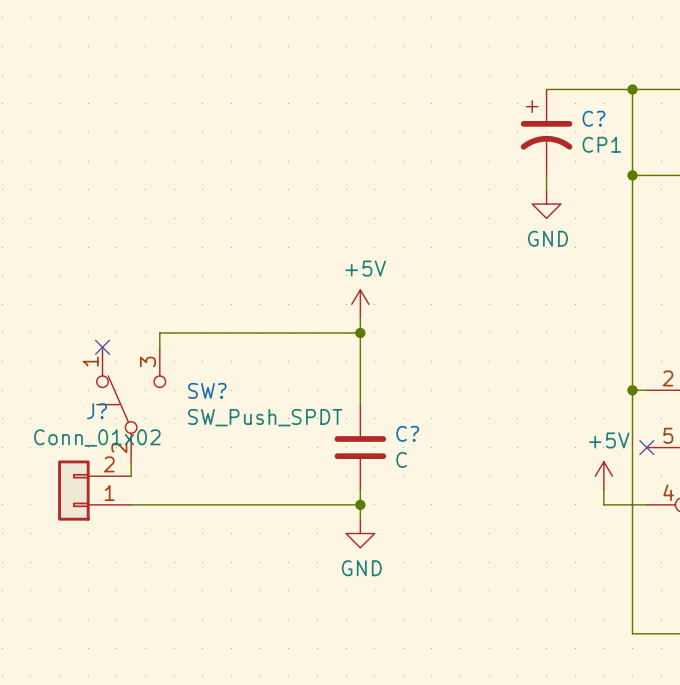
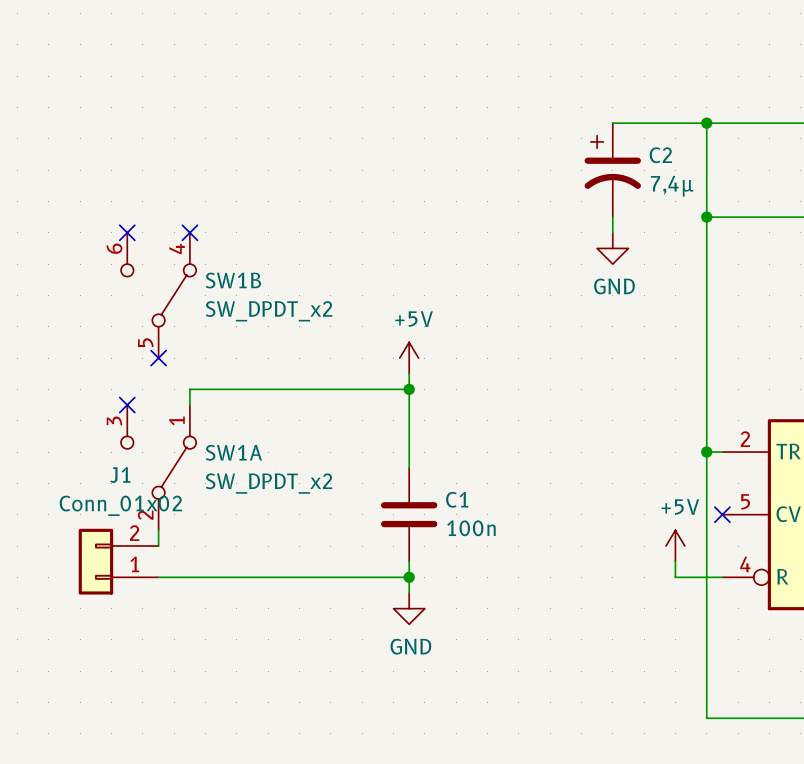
C? name: C? (593, 118) -> C2 (660, 155)
C? value: CP1 (601, 144) -> 7,4µ (672, 186)
no-connect mark: none -> (127, 232)
no-connect mark: none -> (189, 232)
SW1B: none -> SW_DPDT_x2 (158, 295)
no-connect mark: none -> (158, 358)
SW?: SW_Push_SPDT (131, 404) -> none
SW1A: none -> SW_DPDT_x2 (158, 467)
J? name: J? (97, 411) -> J1 (120, 475)
C? name: C? (407, 433) -> C1 (457, 499)
C? value: C (401, 459) -> 100n (471, 528)

